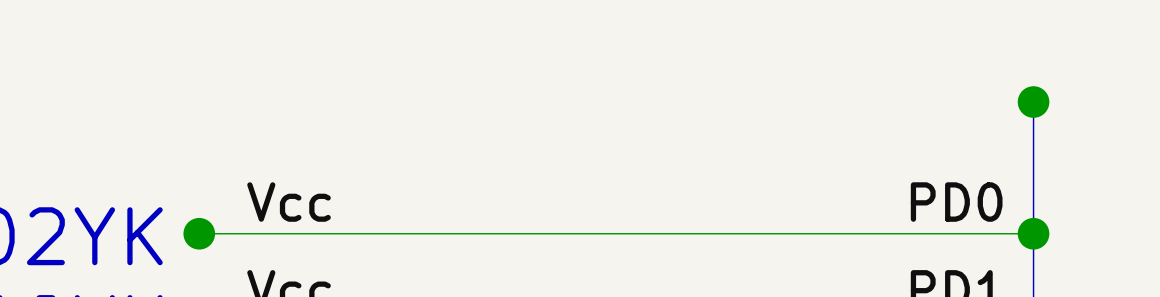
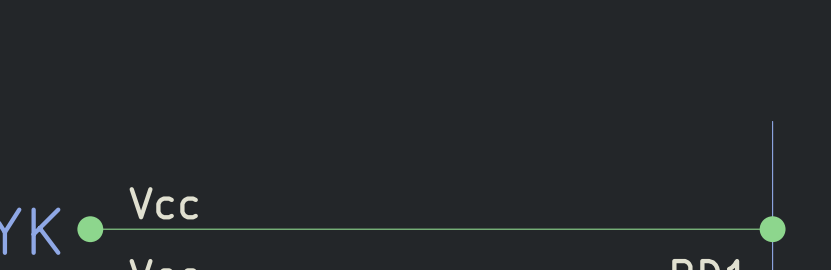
junction: (1033, 102) -> none
label: PD0 (956, 202) -> none

